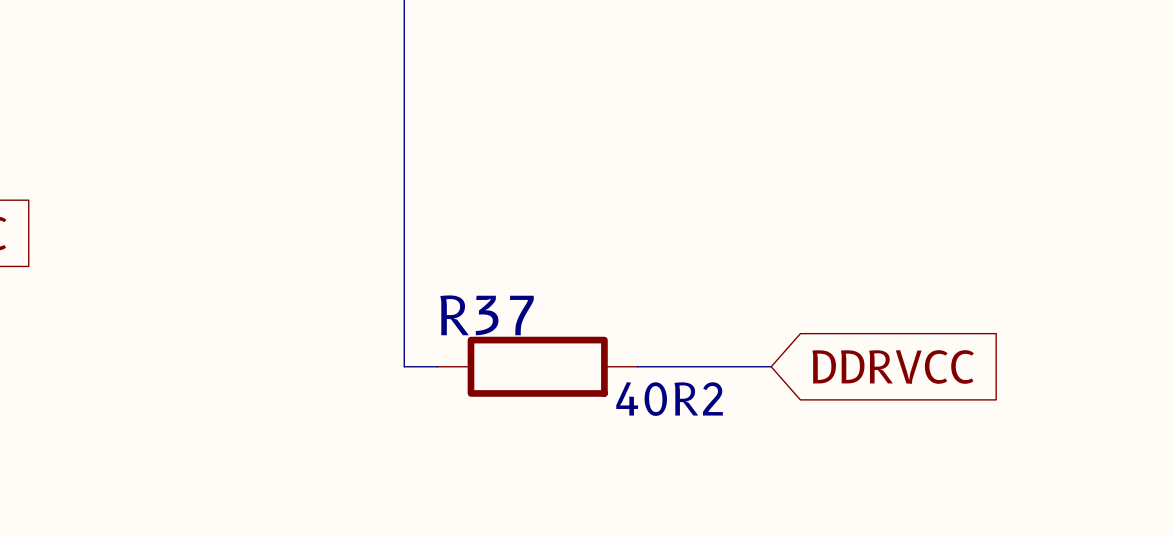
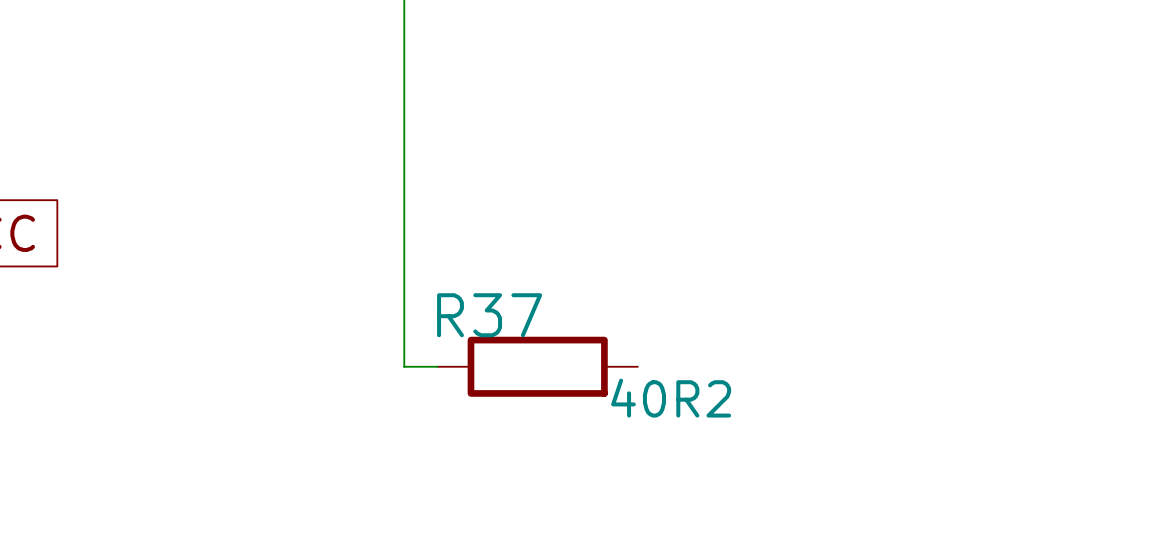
wire: (637, 366) (771, 366) -> none
global label: DDRVCC (893, 366) -> none

